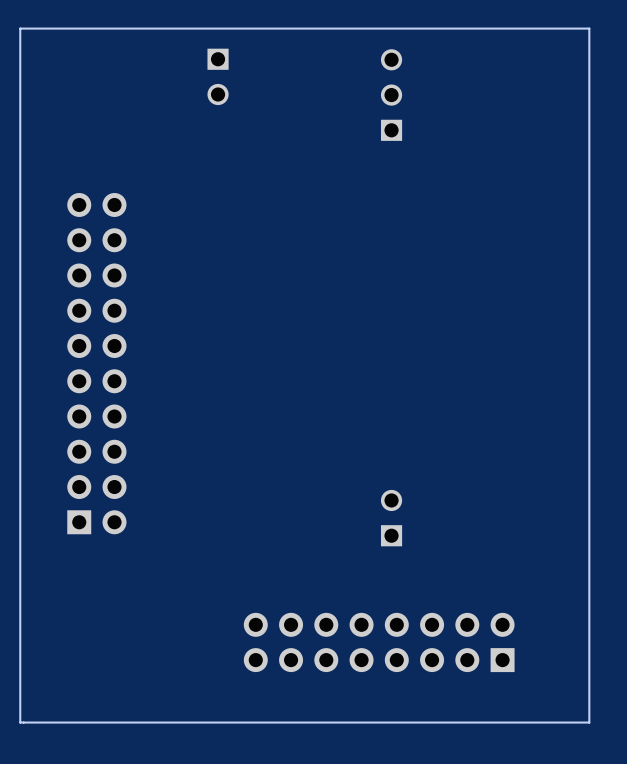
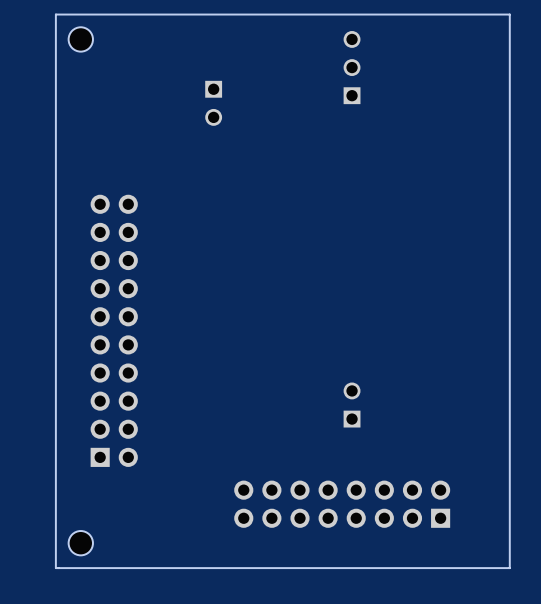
part: none -> (80, 39)
part position: (218, 76) -> (213, 103)
part position: (96, 363) -> (114, 330)
part: none -> (80, 543)

